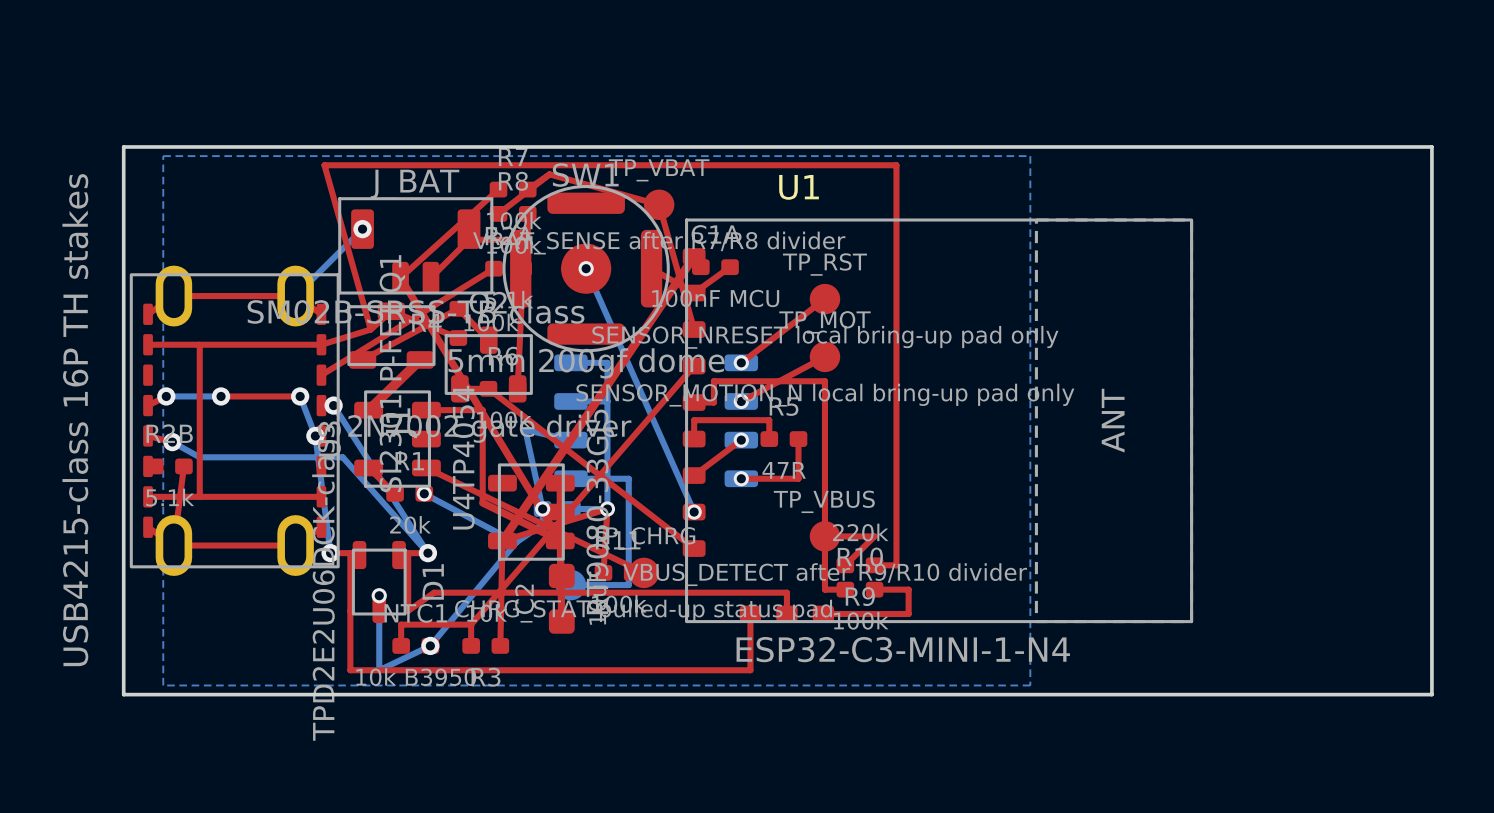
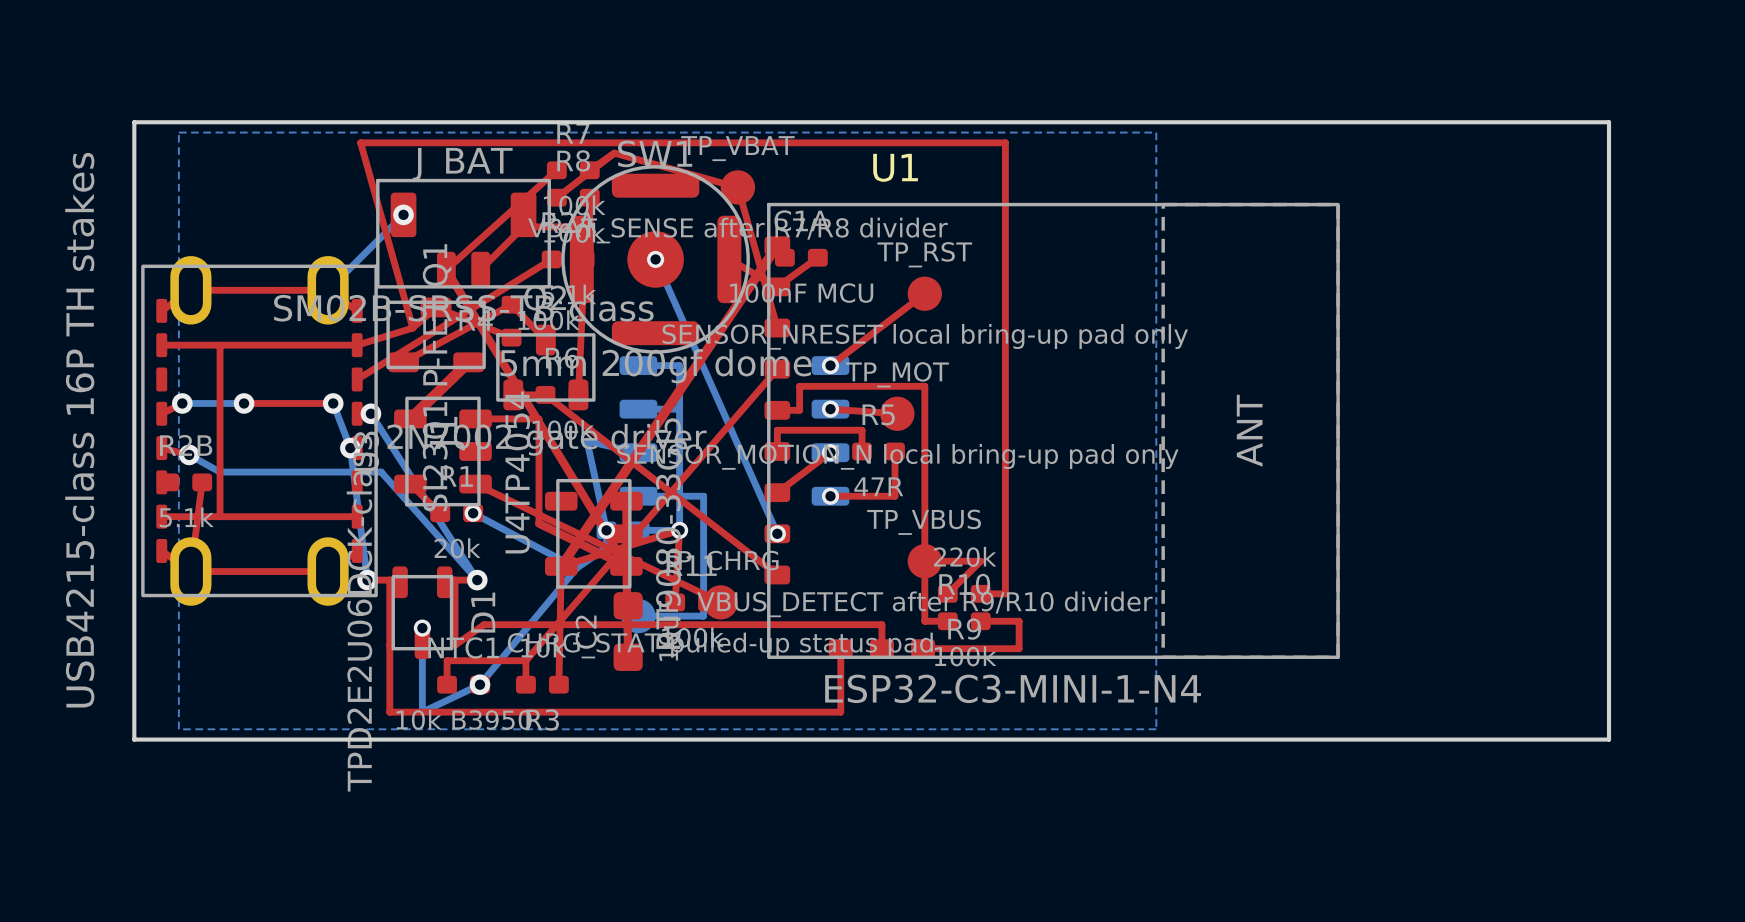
top track: (824, 356) (741, 401) -> (897, 413) (830, 409)
TP_MOT position: (824, 356) -> (897, 413)

